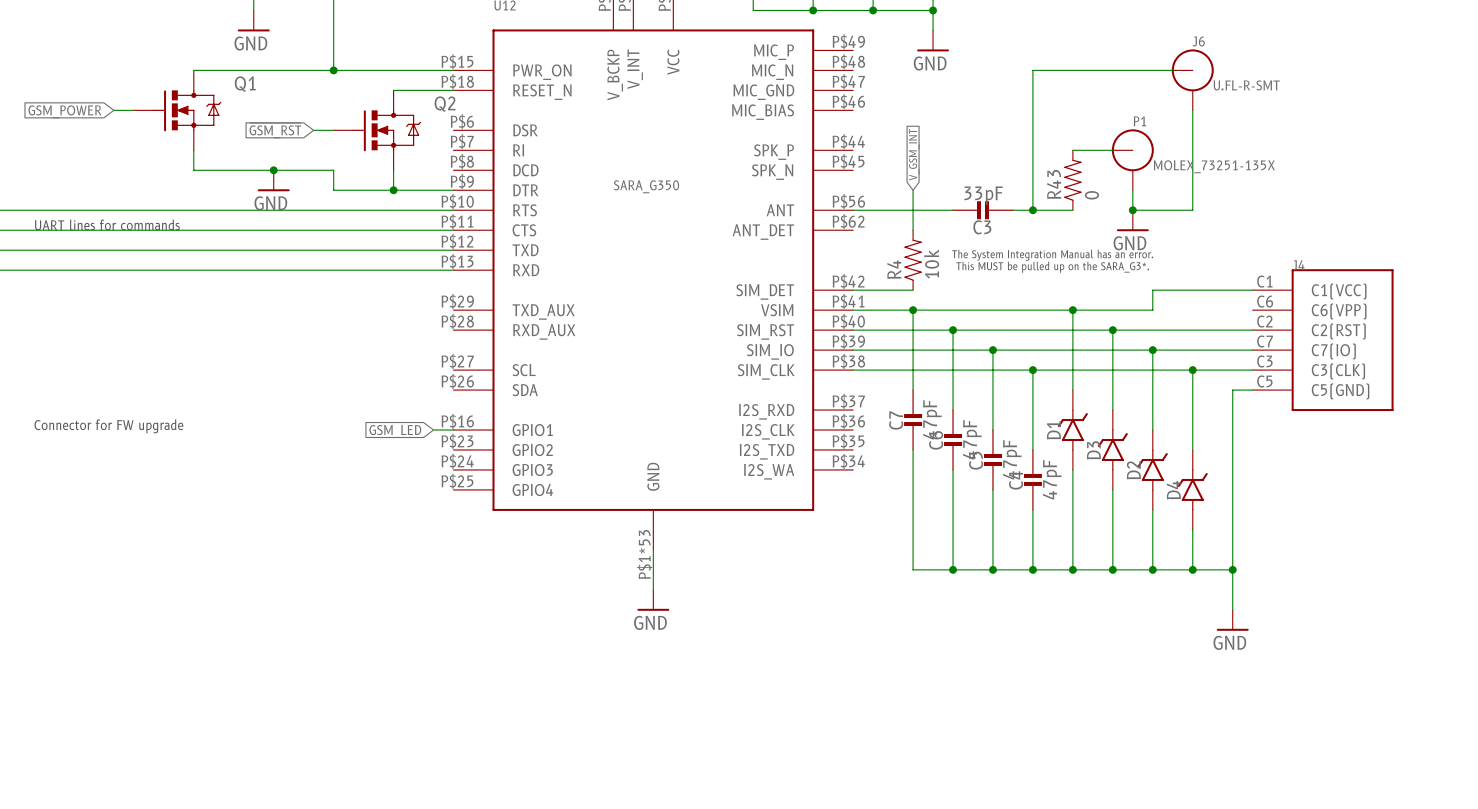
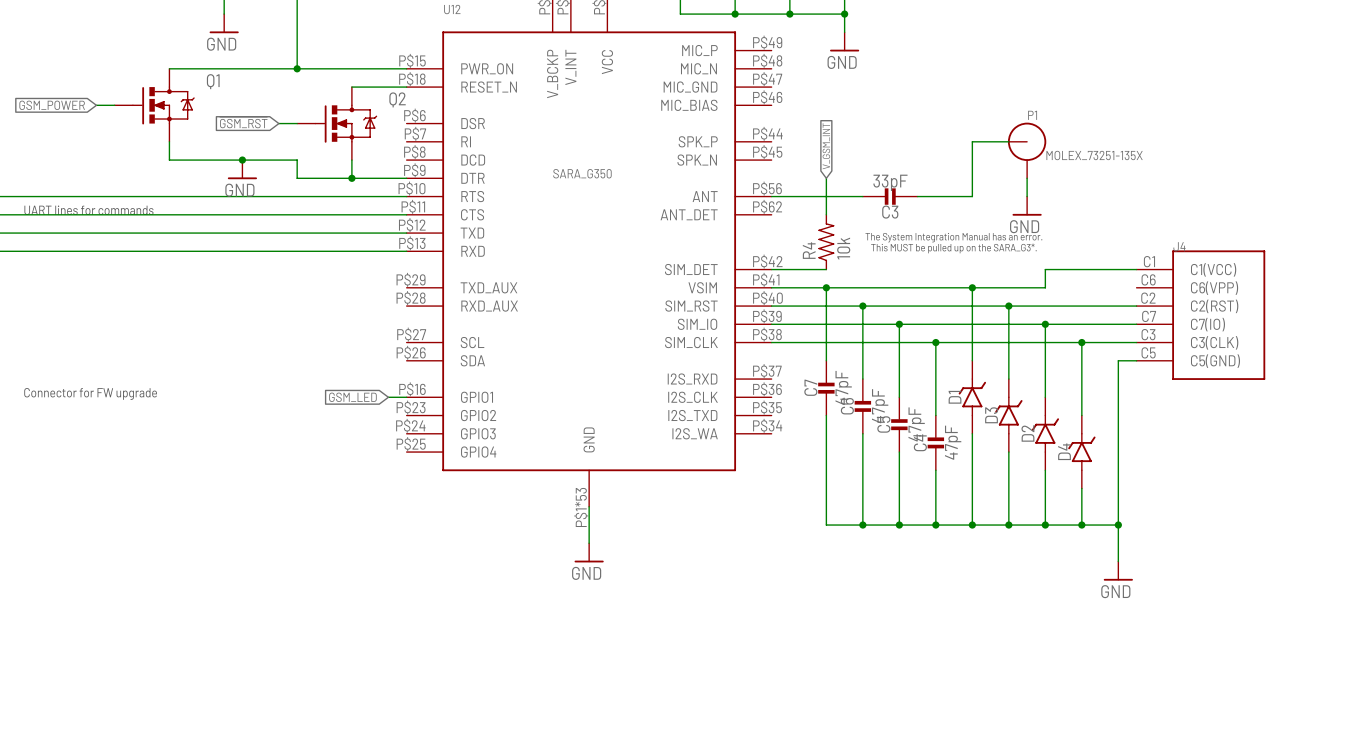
wire: (1172, 70) (1032, 70) (1032, 210) -> none
J6: U.FL-R-SMT (1192, 79) -> none
wire: (1192, 110) (1192, 210) (1132, 210) -> none
R43: 0 (1072, 180) -> none
junction: (1032, 210) -> none
junction: (1132, 210) -> none

